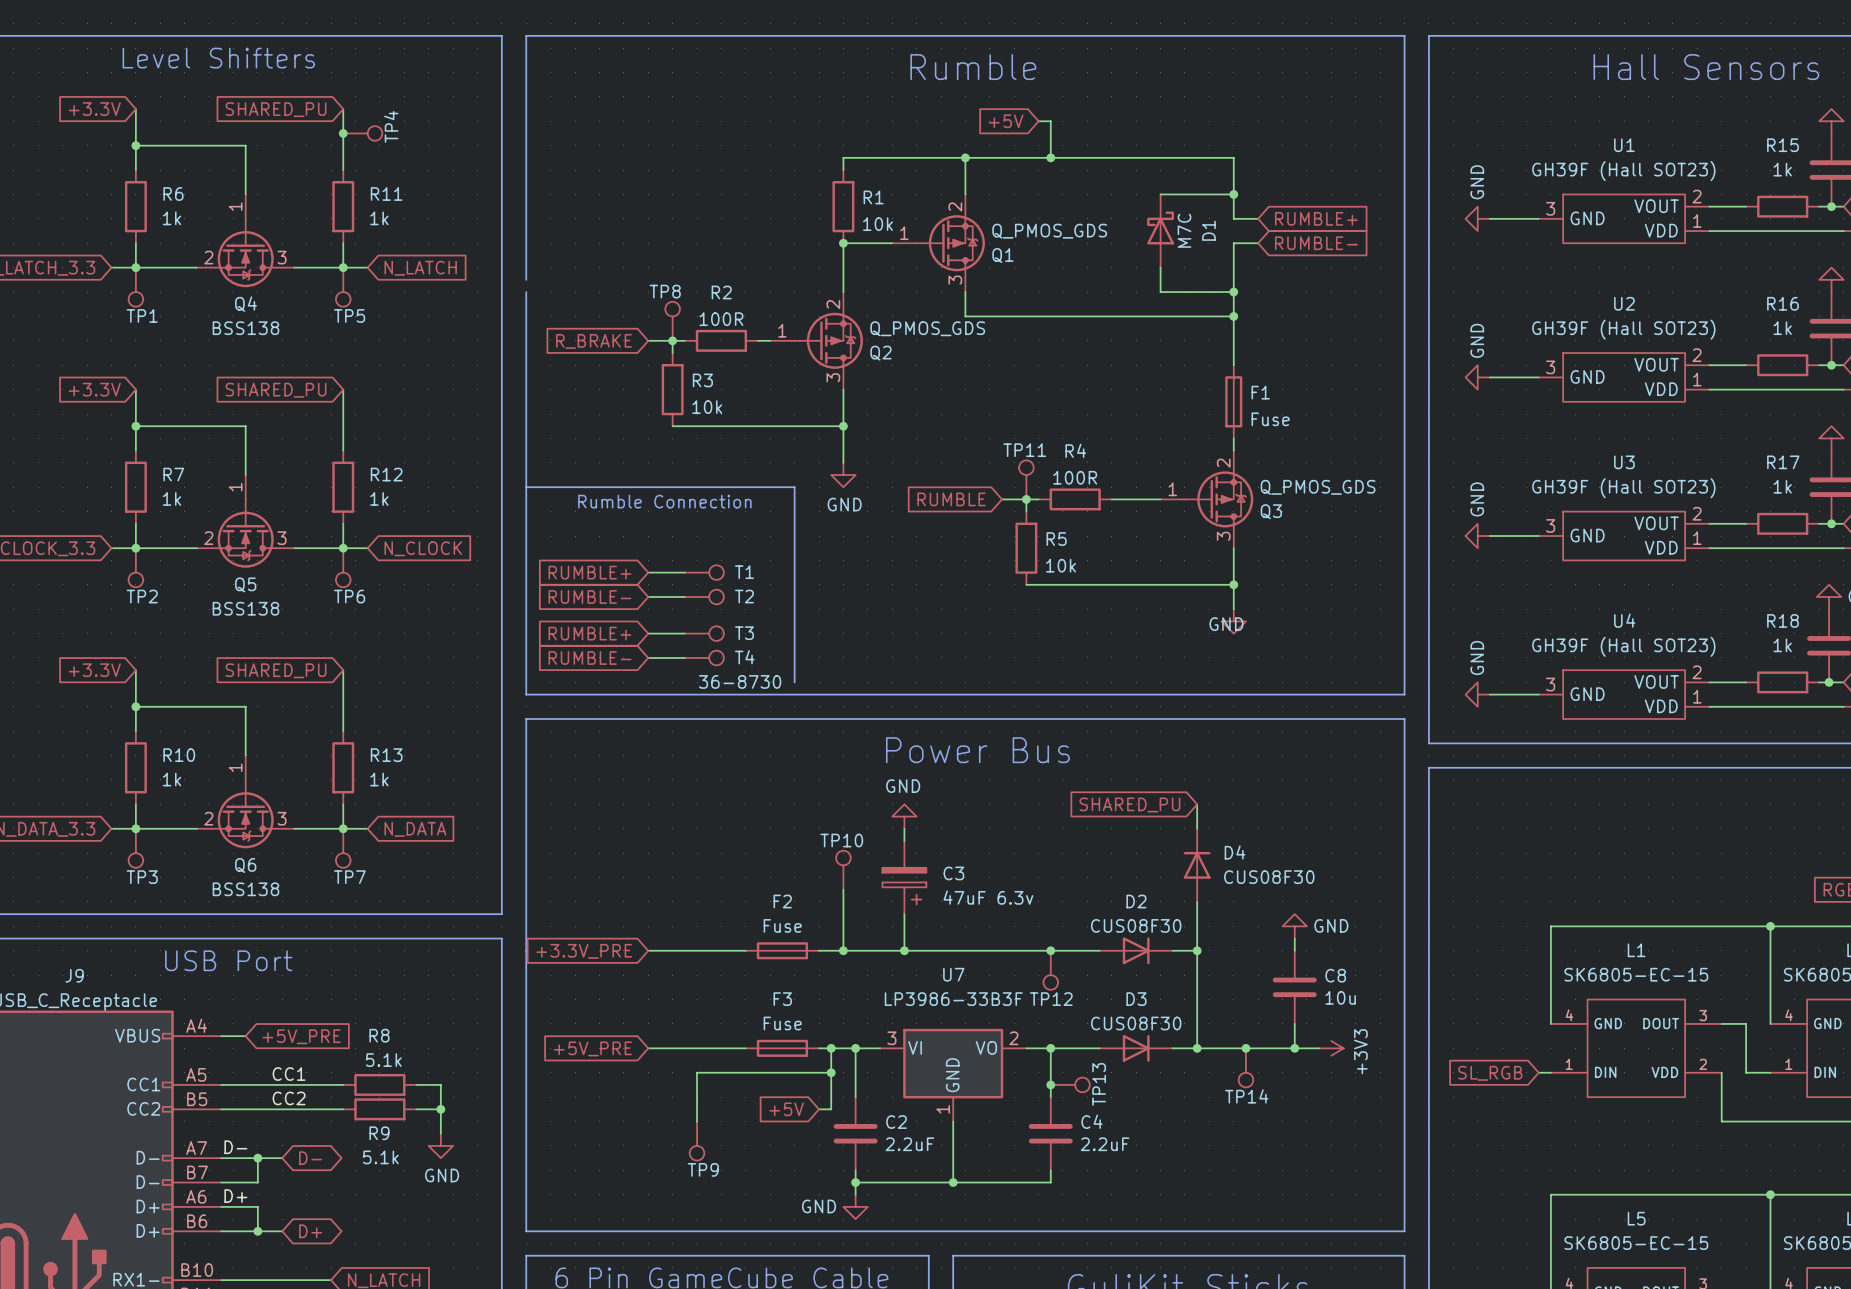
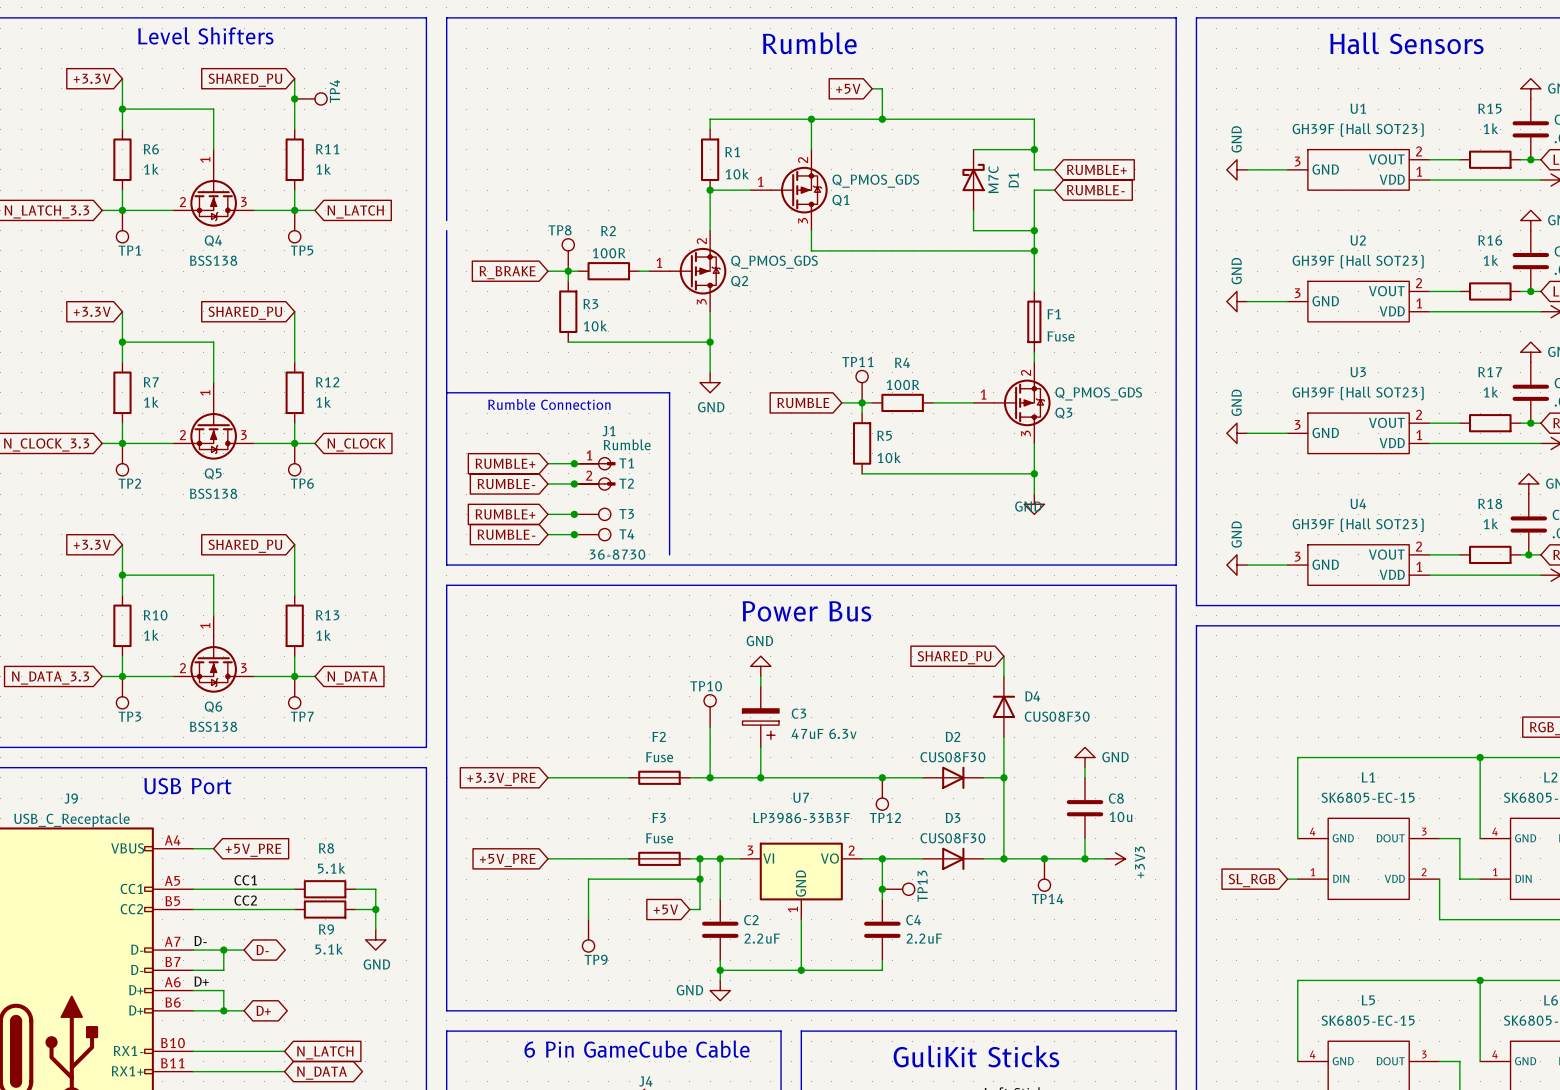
junction: none -> (574, 463)
J1: none -> Rumble (594, 473)
junction: none -> (574, 483)
junction: none -> (574, 514)
junction: none -> (574, 534)

